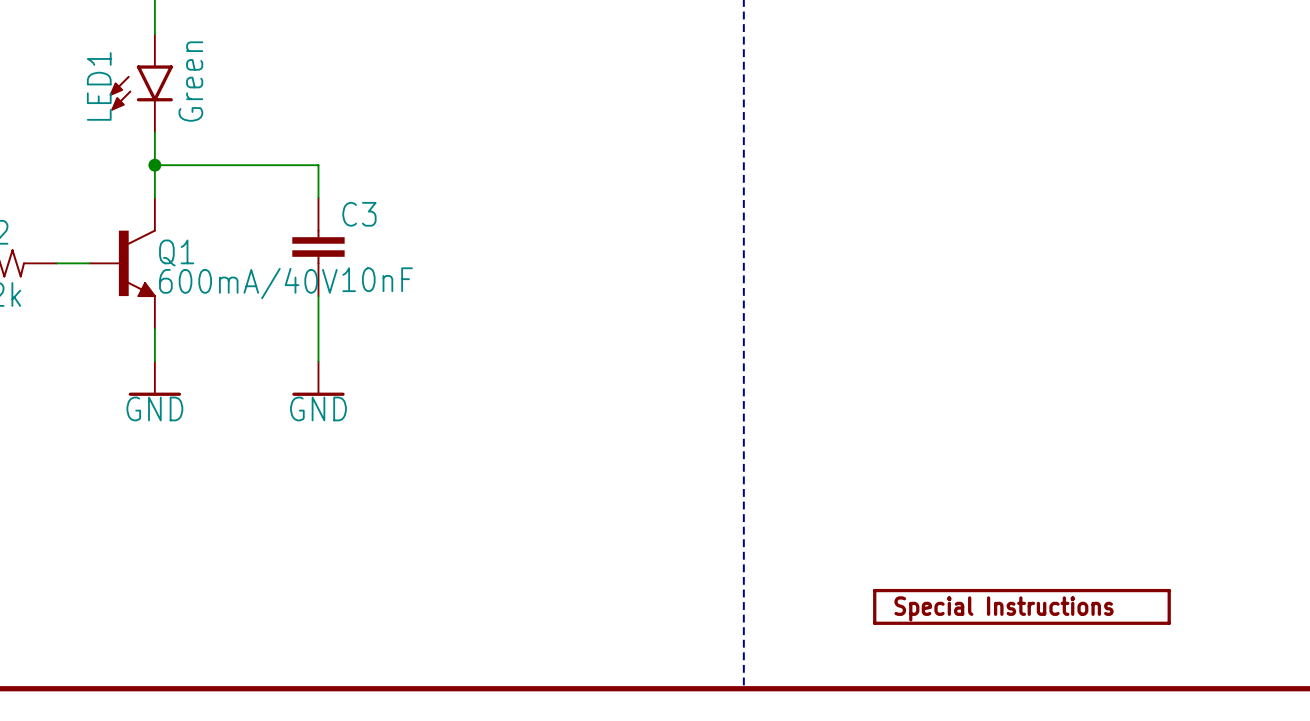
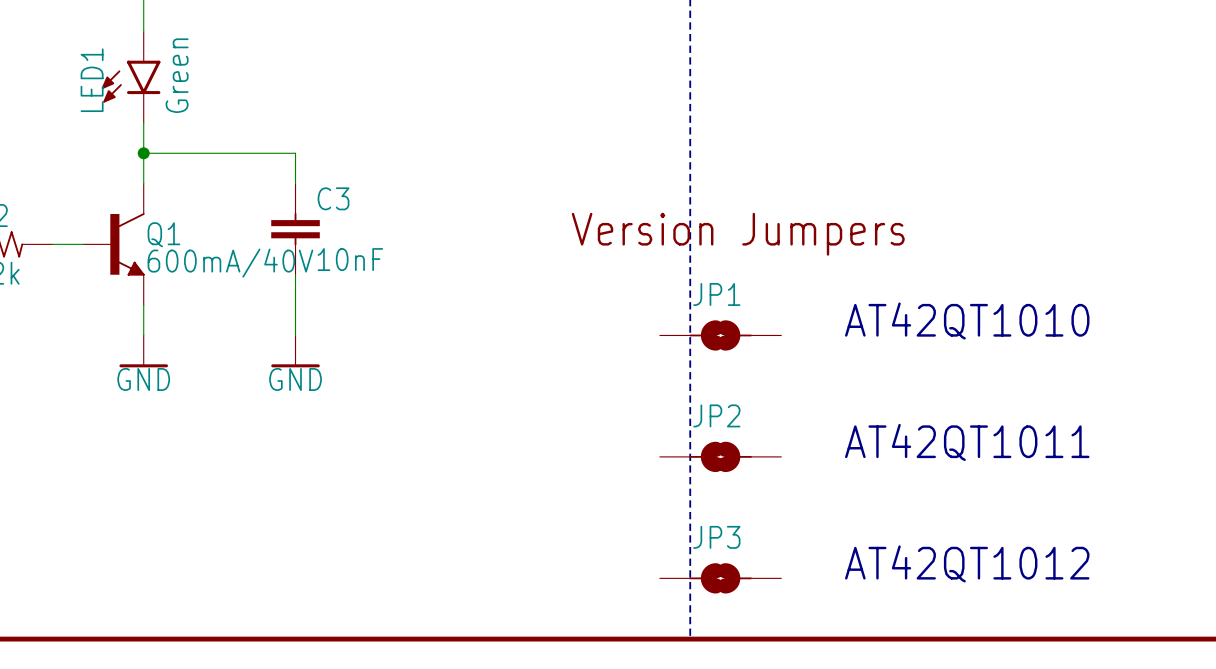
text: none -> Version Jumpers (738, 234)
text: none -> AT42QT1010 (967, 321)
JP1: none -> (720, 335)
text: none -> AT42QT1011 (967, 442)
JP2: none -> (720, 456)
part: (1021, 606) -> none
text: none -> AT42QT1012 (967, 563)
JP3: none -> (720, 578)

